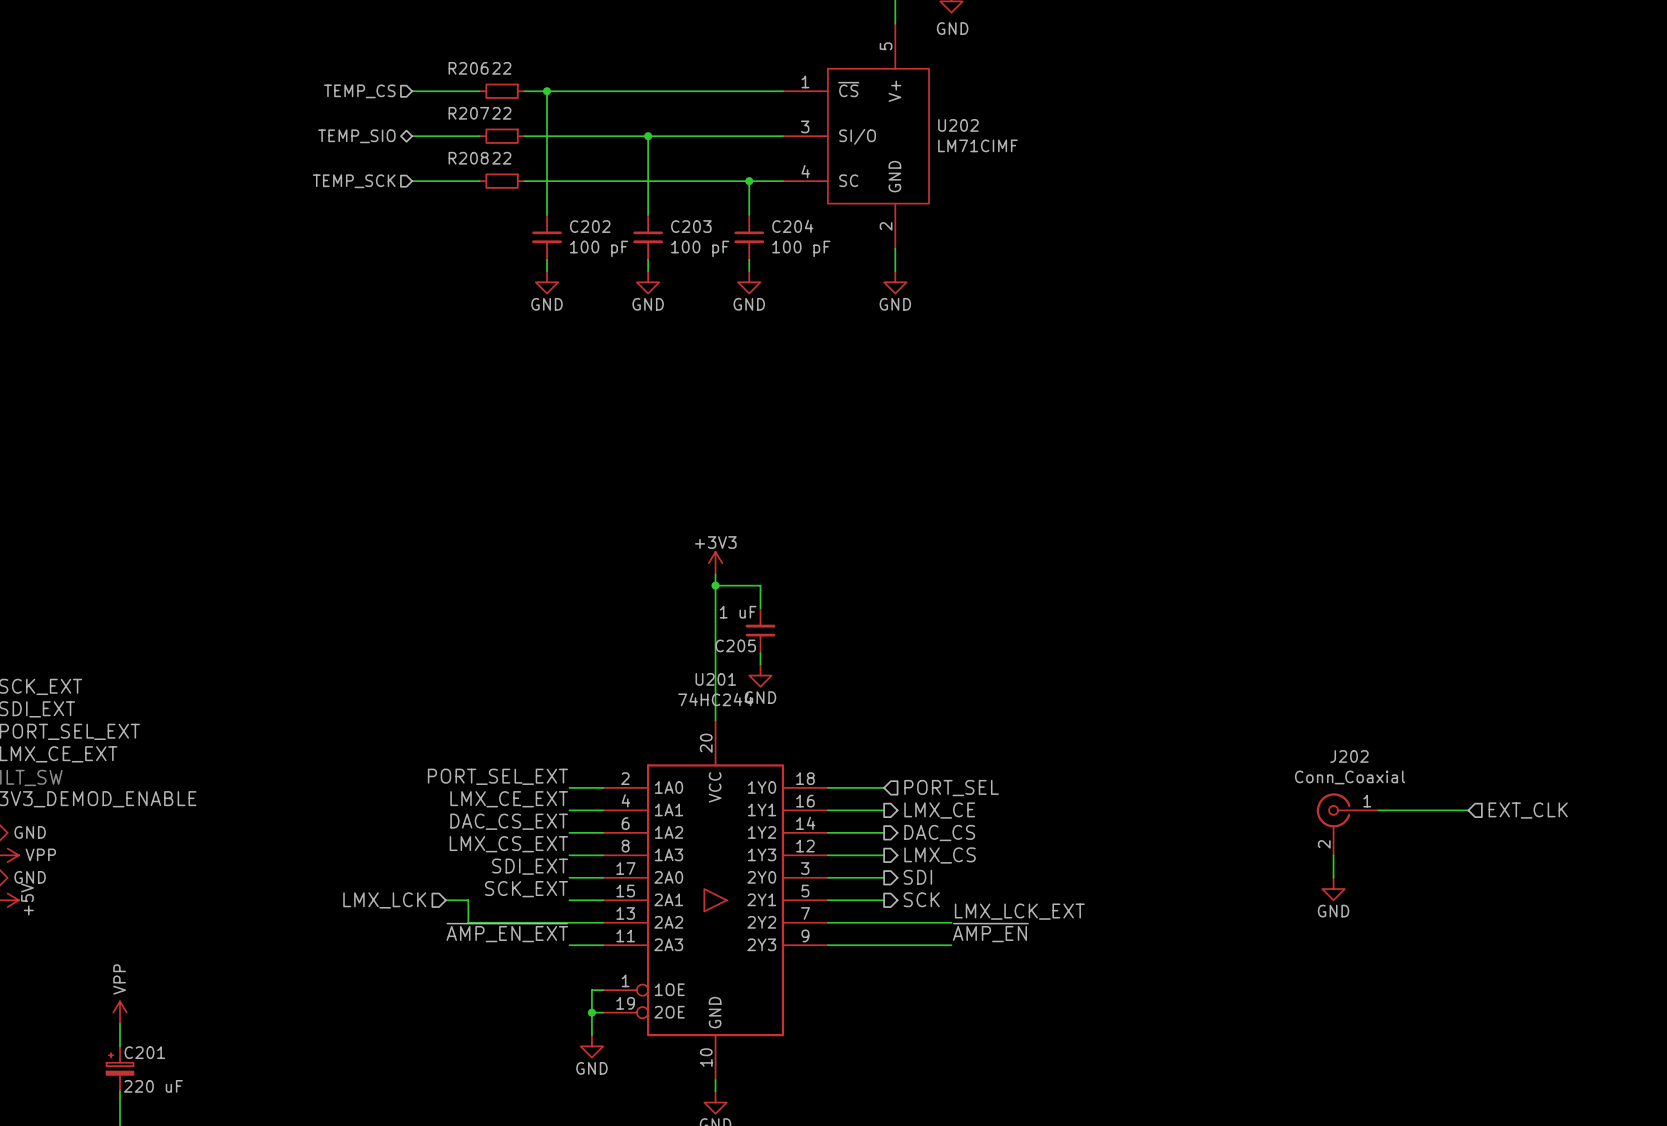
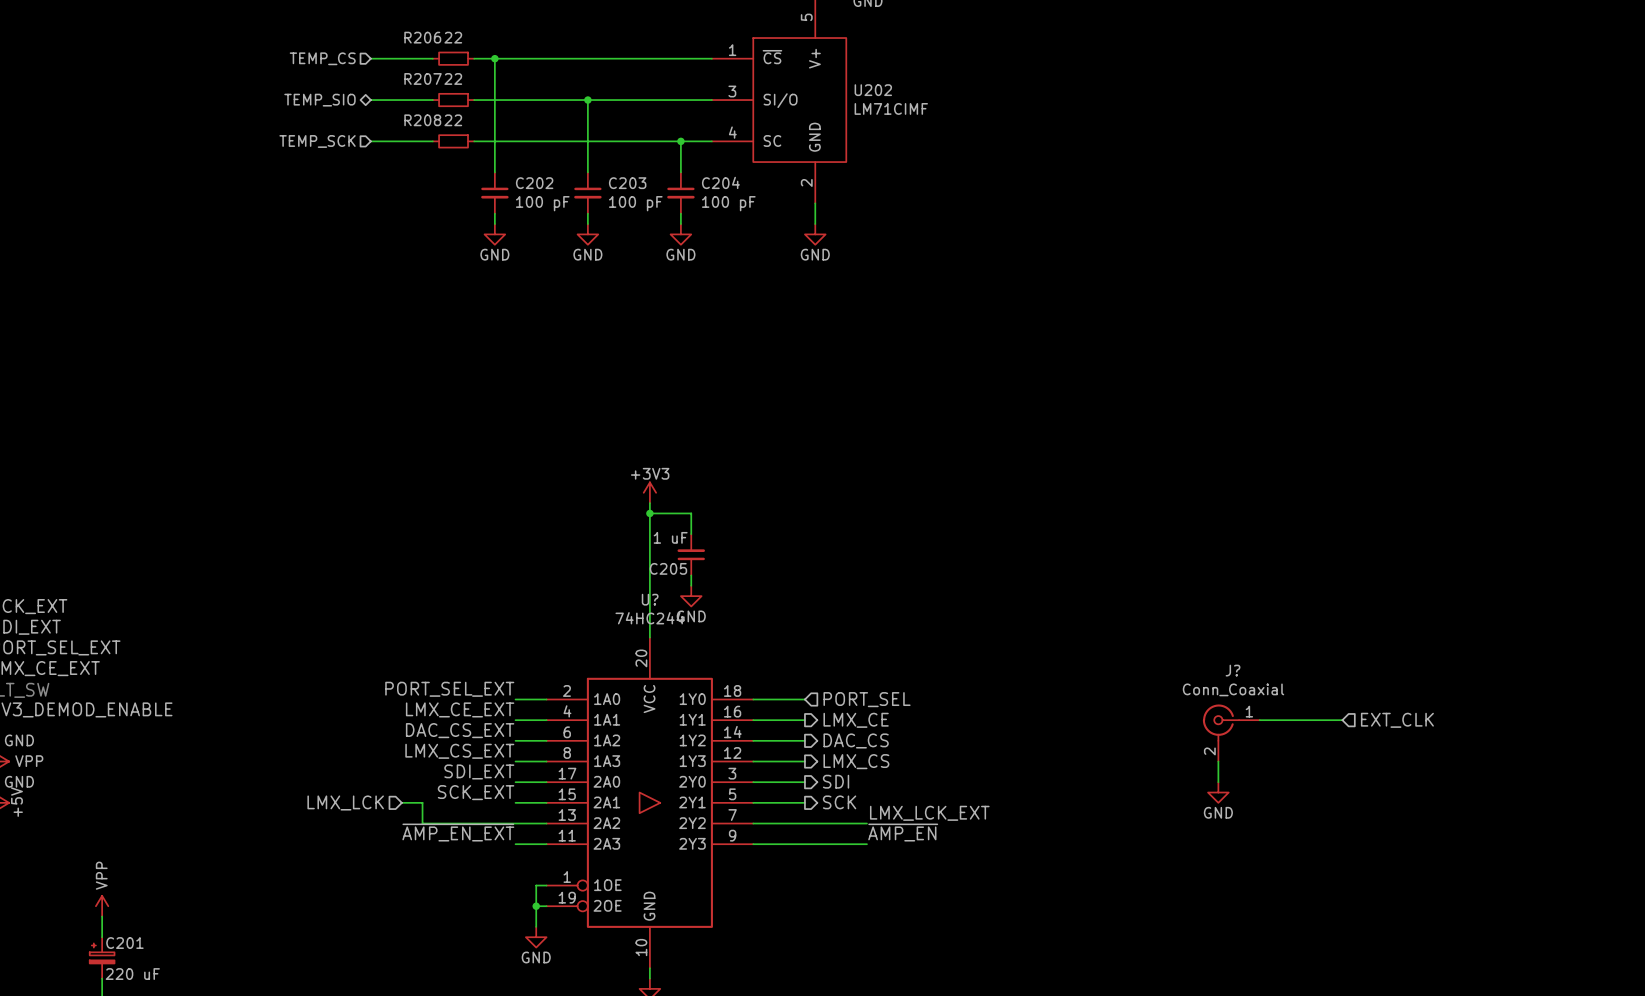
U201 name: U201 (715, 679) -> U? (650, 599)
J202 name: J202 (1349, 756) -> J? (1233, 670)

